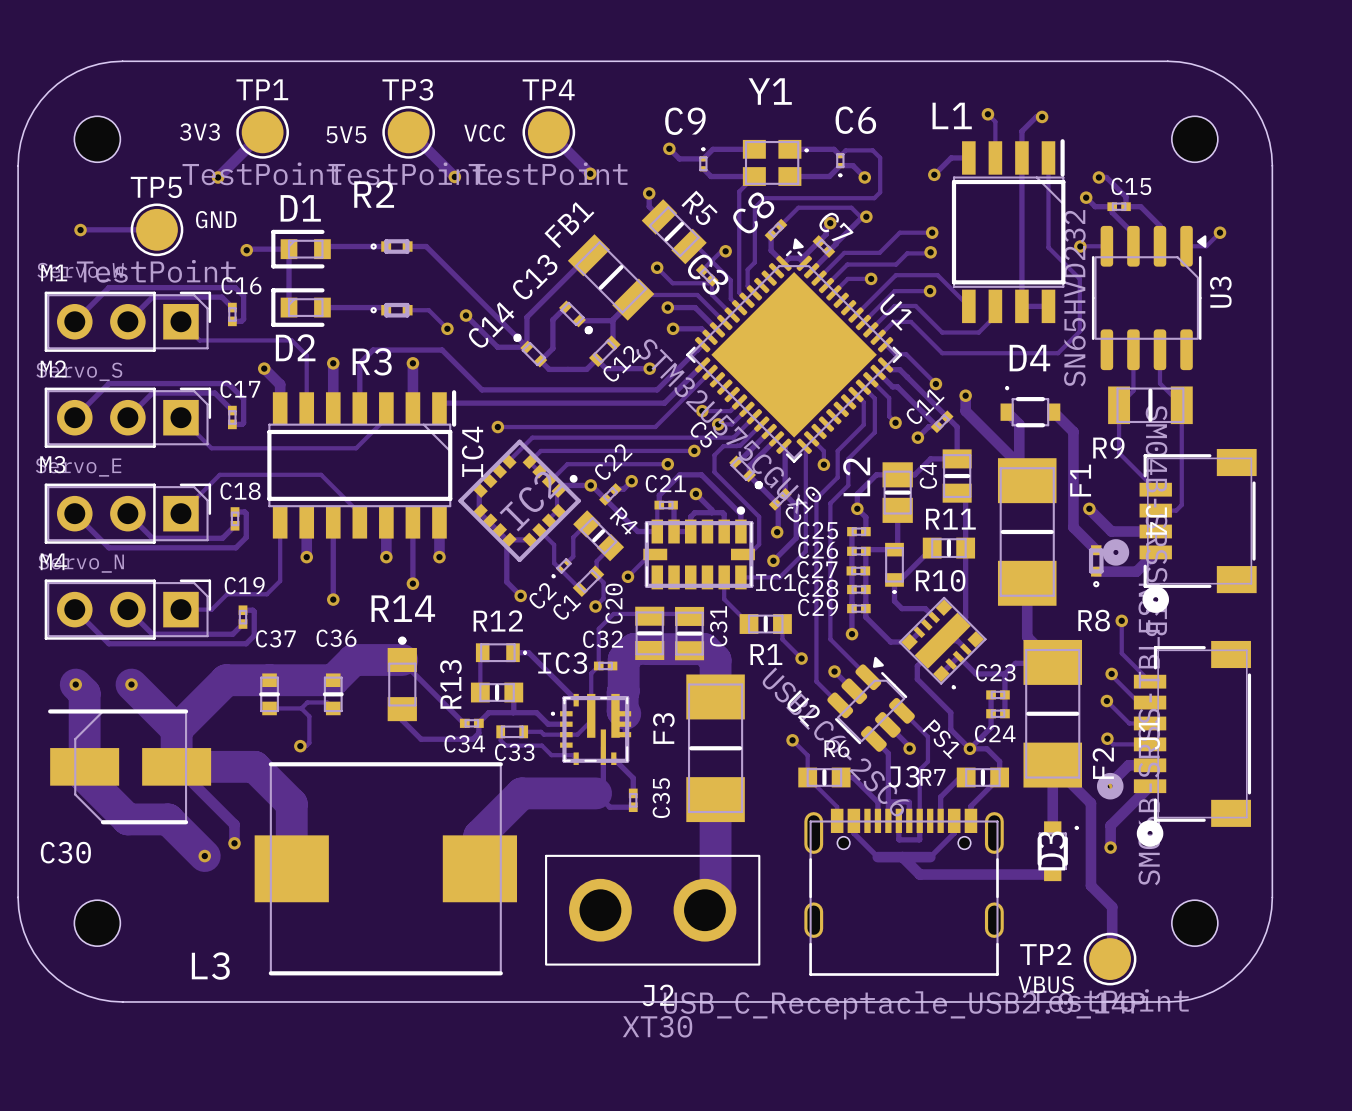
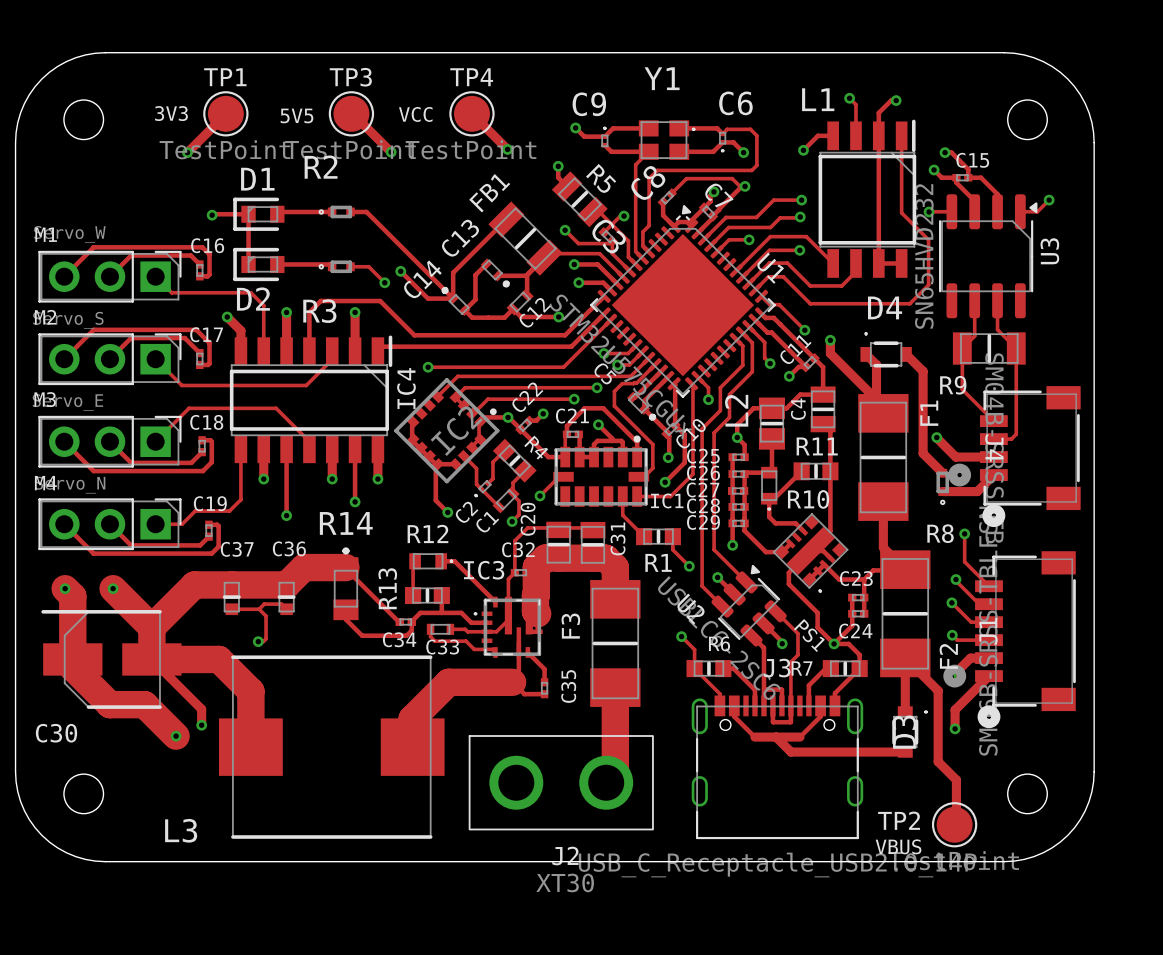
text: GND (216, 219) -> none
track: (80, 229) (156, 229) -> none
TP5: TestPoint (156, 229) -> none
via: (80, 230) -> none

